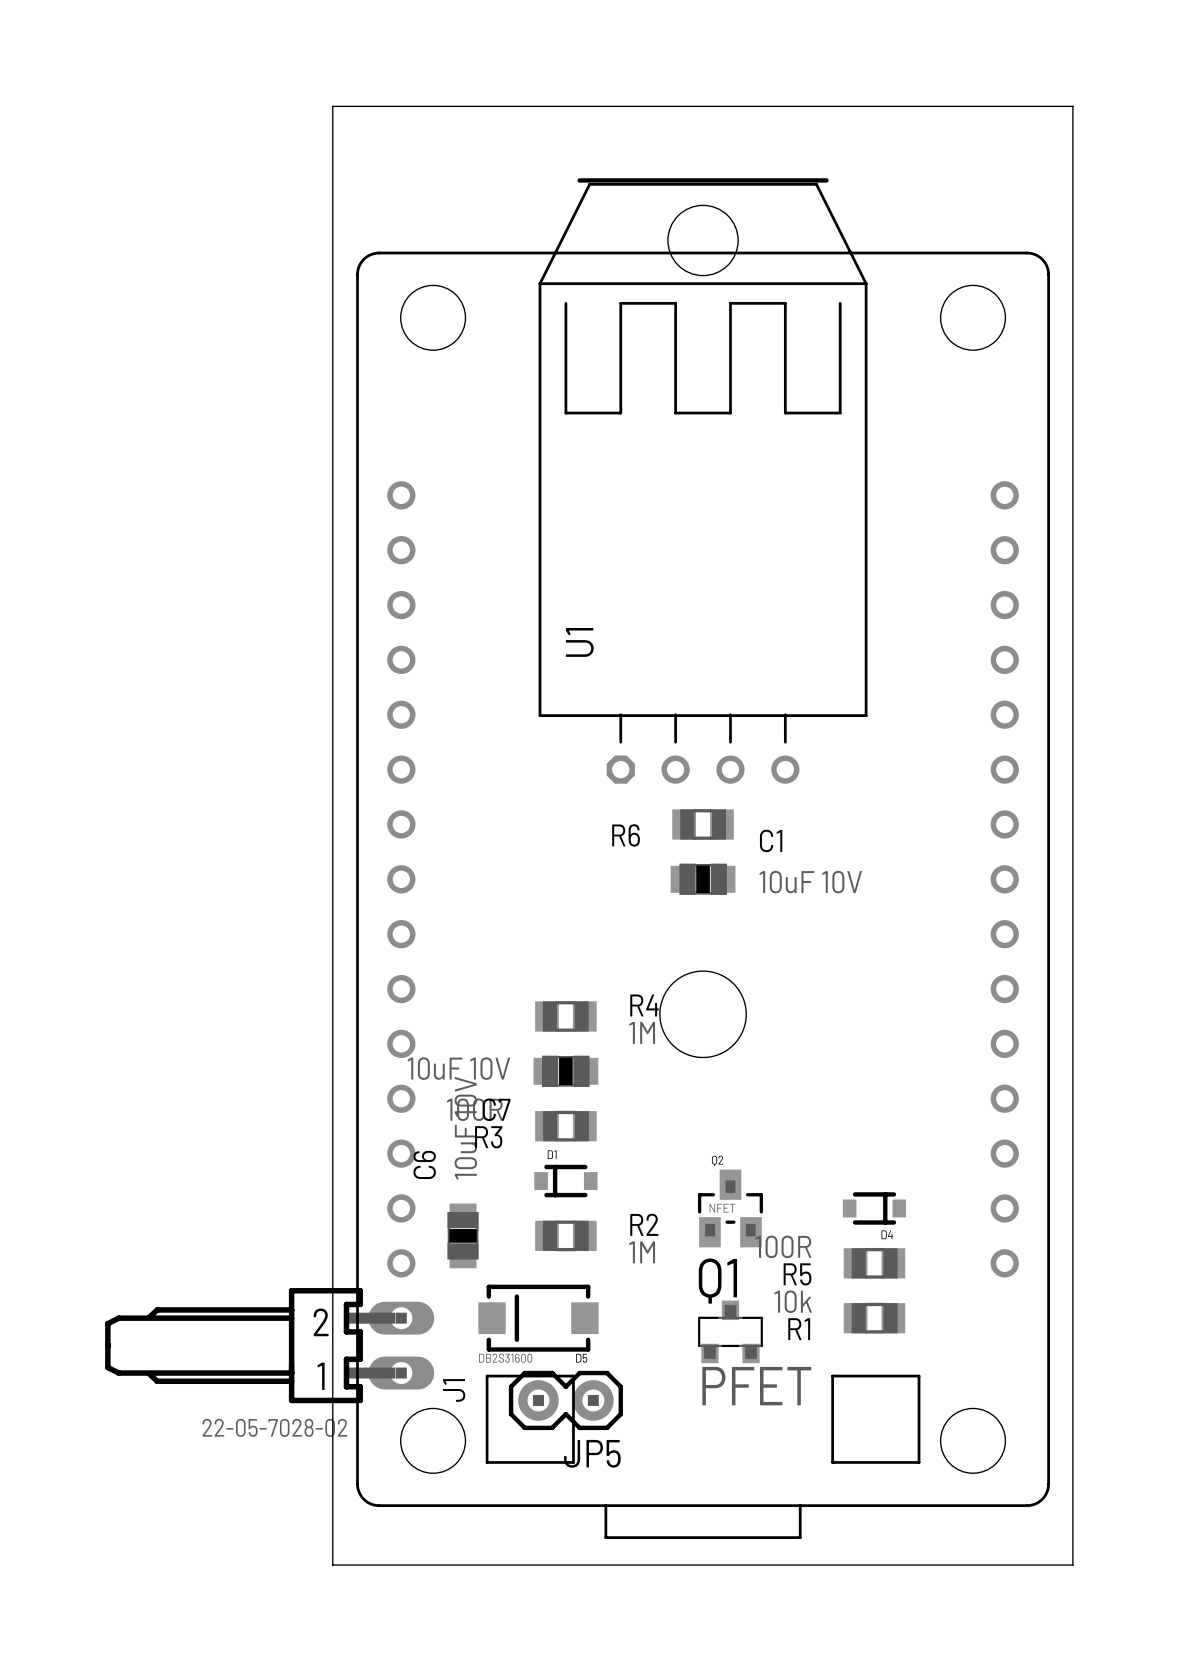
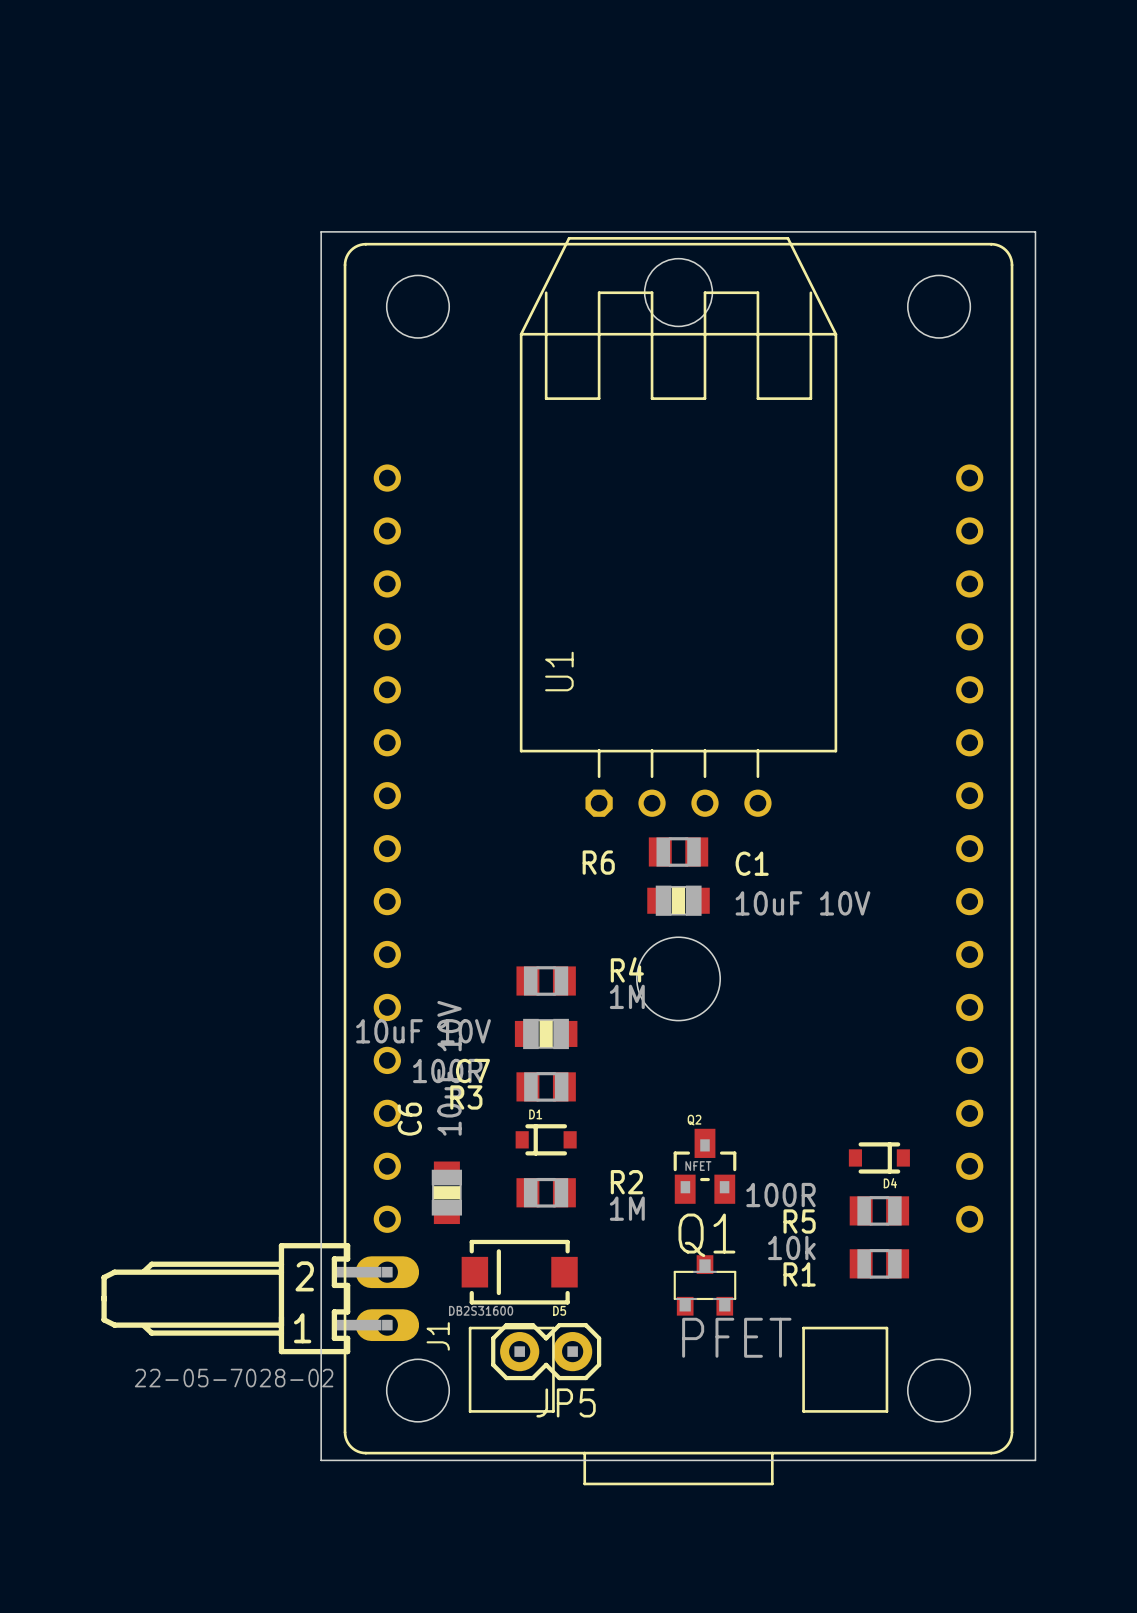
line: (579, 180) (826, 180) -> none
board edge: (332, 240) (332, 106) (1072, 106) (1072, 240) -> (321, 231) (1035, 231)
U1 position: (703, 483) -> (678, 526)
R6 position: (703, 824) -> (678, 851)
C1 position: (703, 879) -> (678, 900)
D4 position: (874, 1208) -> (879, 1157)
R5 position: (874, 1263) -> (879, 1210)
R1 position: (874, 1318) -> (879, 1263)
board edge: (332, 1513) (332, 1565) (1072, 1565) (1072, 1513) -> (321, 1460) (1035, 1460)

